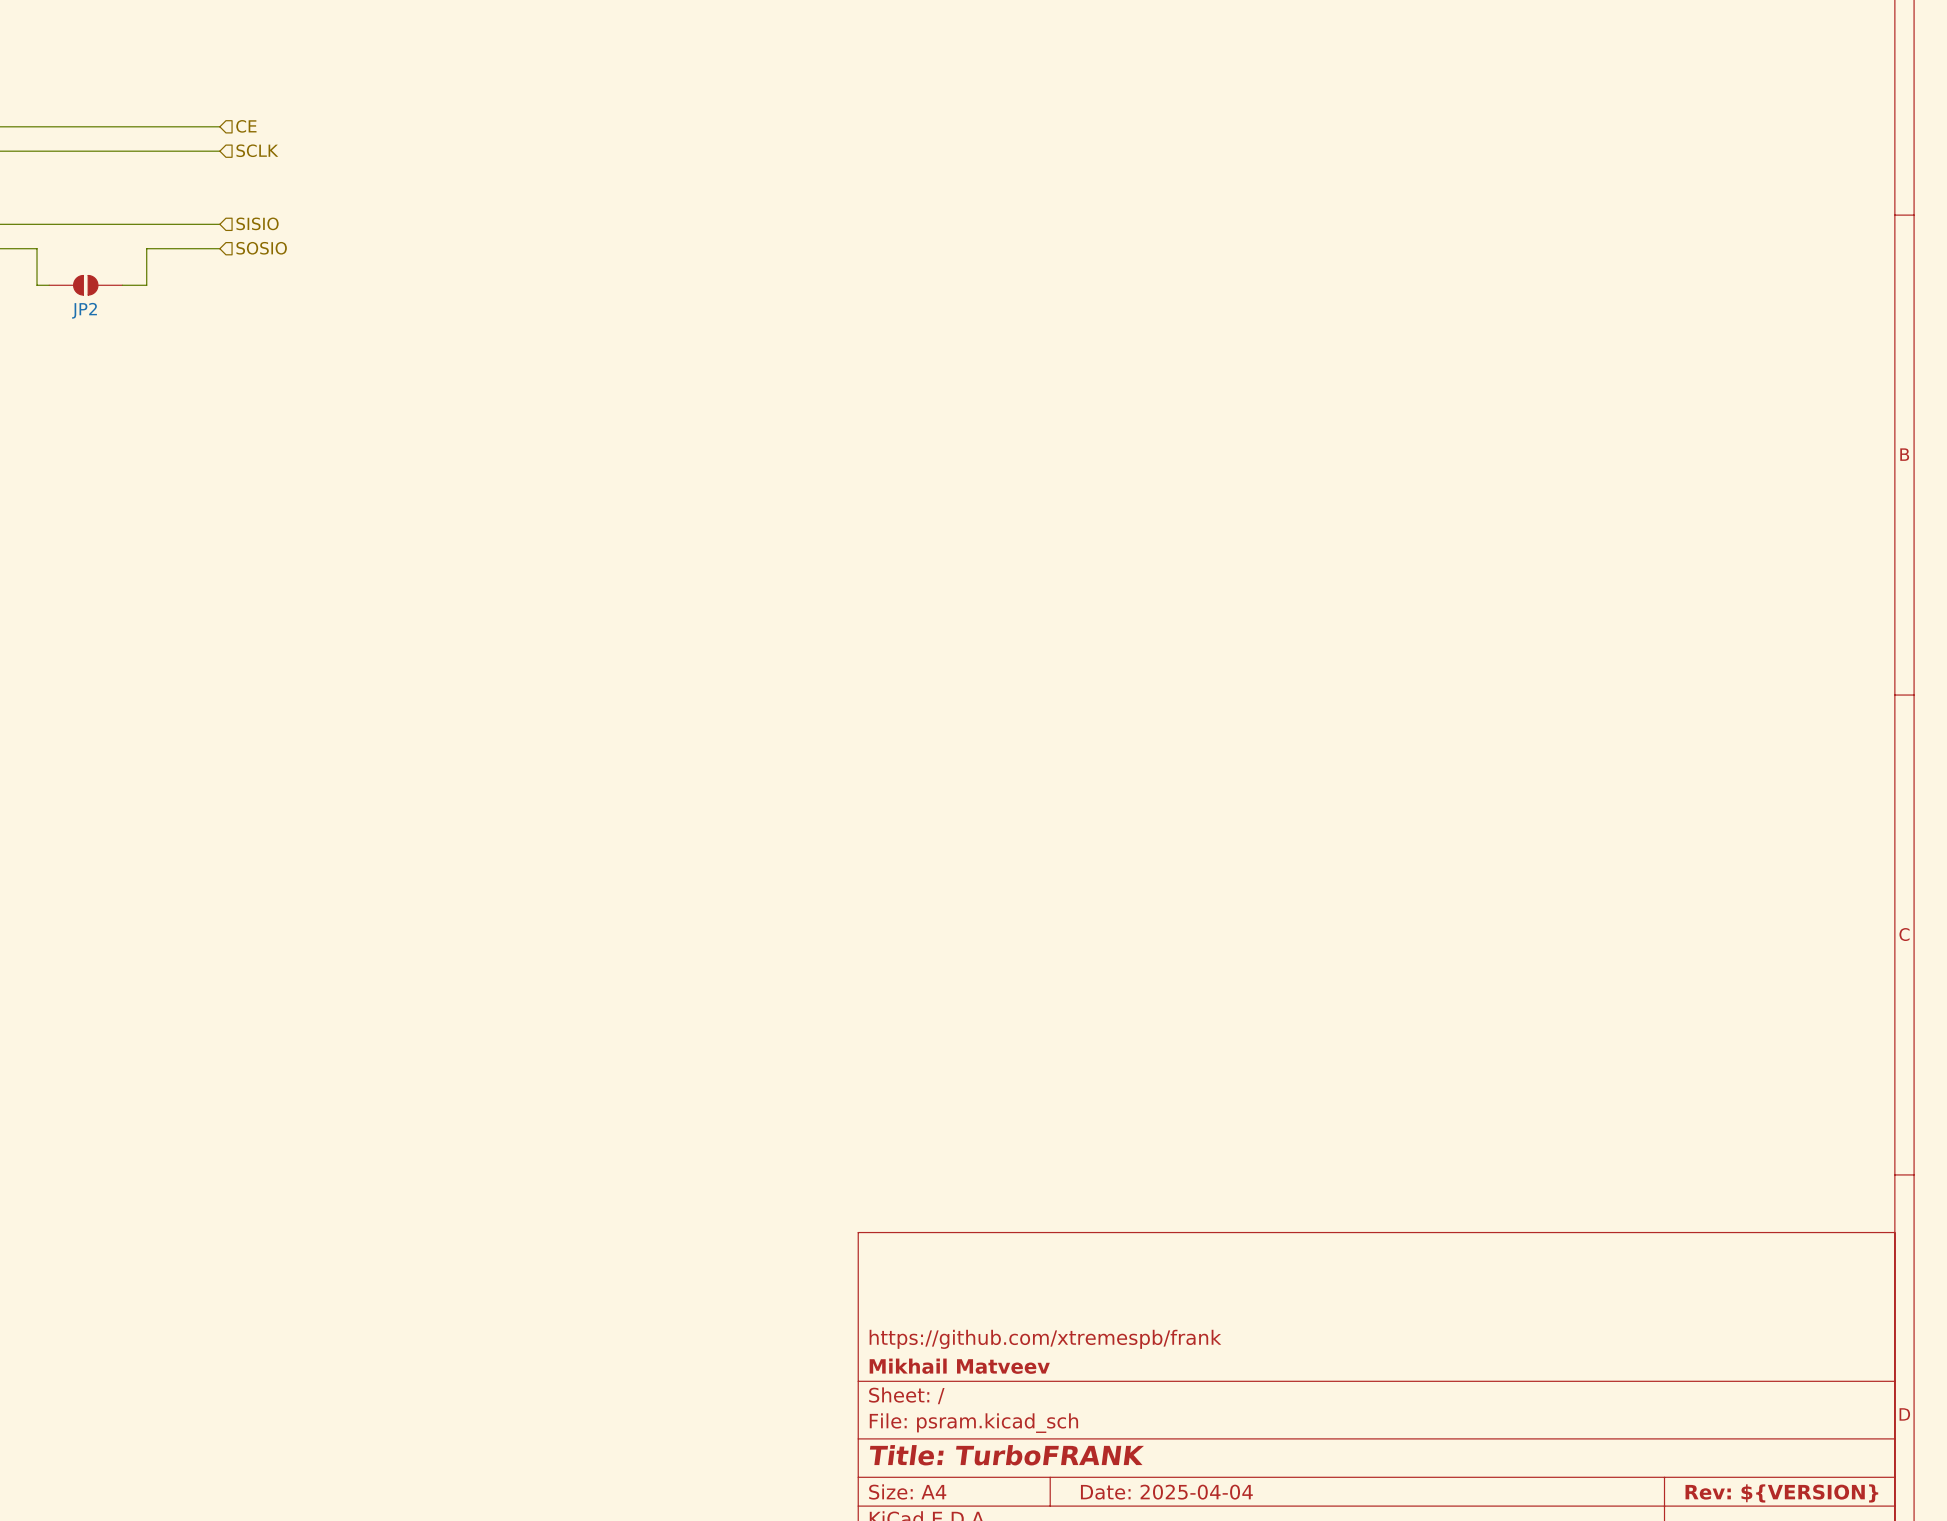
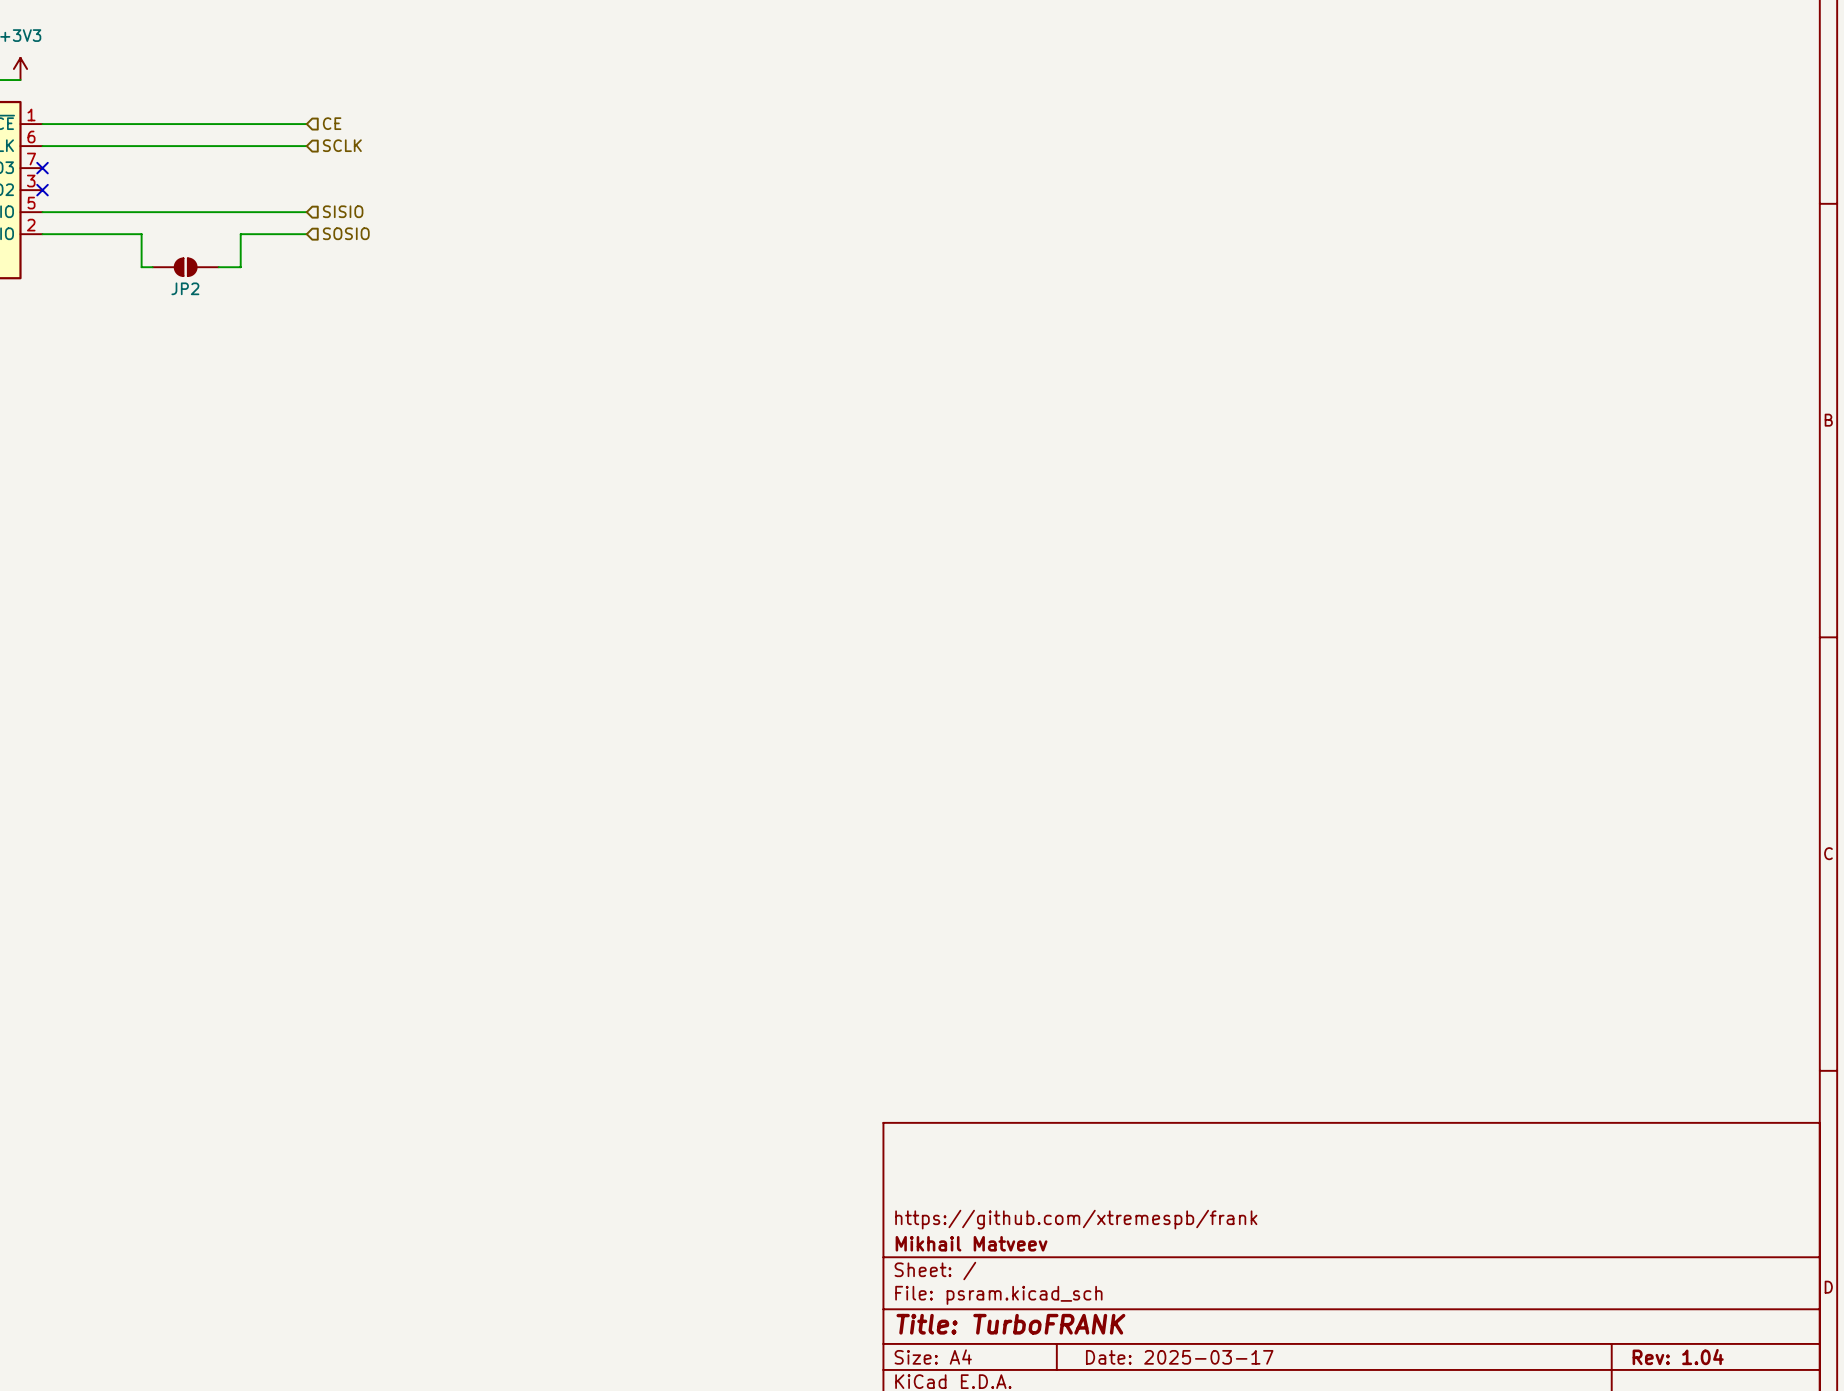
title block: Date: 2025-04-04 (1166, 1492) -> Date: 2025-03-17 (1179, 1357)
title block: Rev: ${VERSION} (1781, 1493) -> Rev: 1.04 (1678, 1357)

